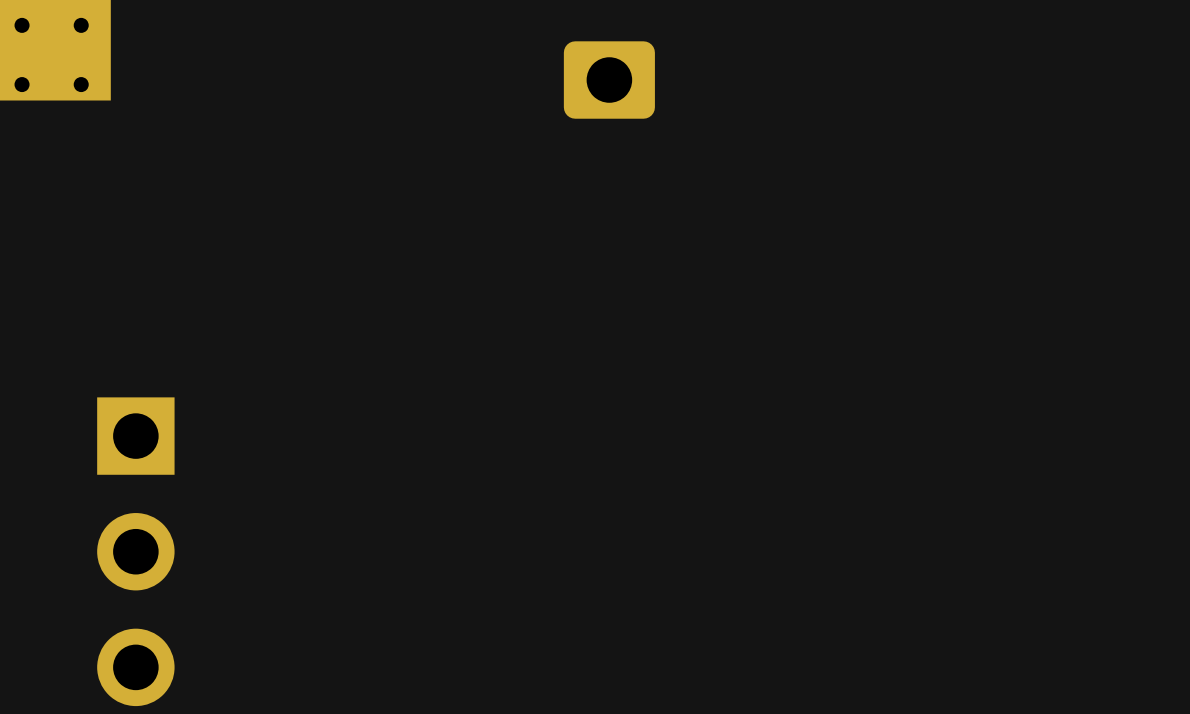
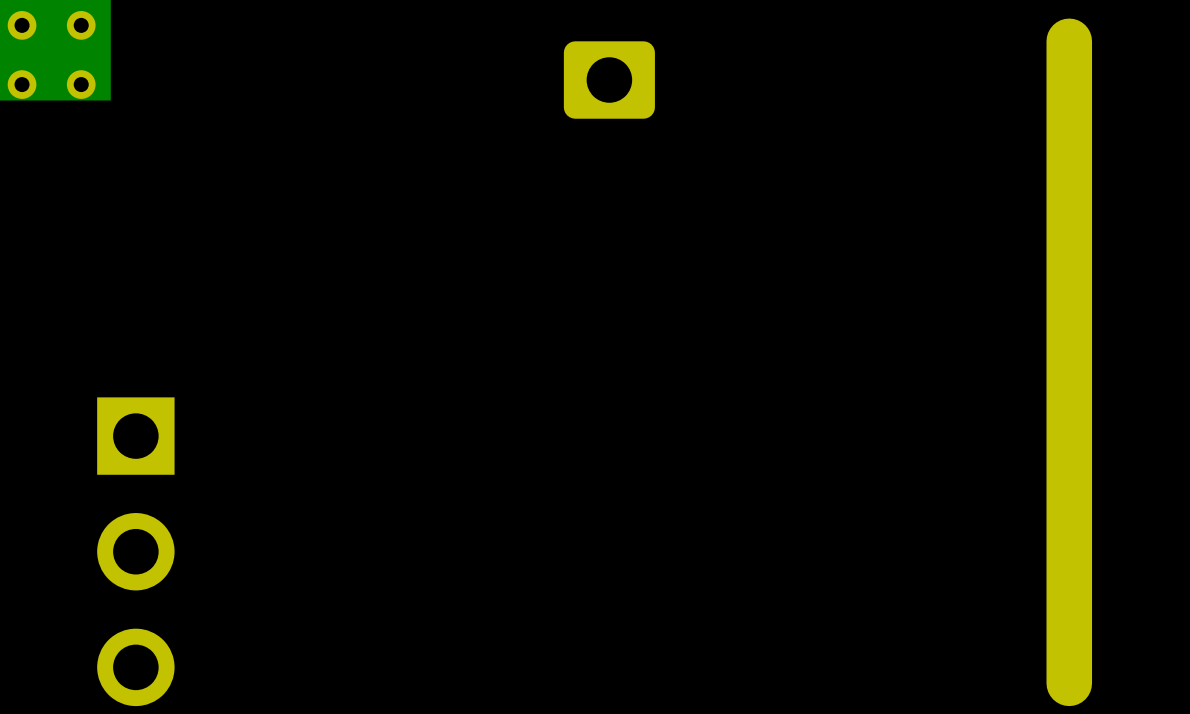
board edge: none -> (1069, 41) (1069, 683)

